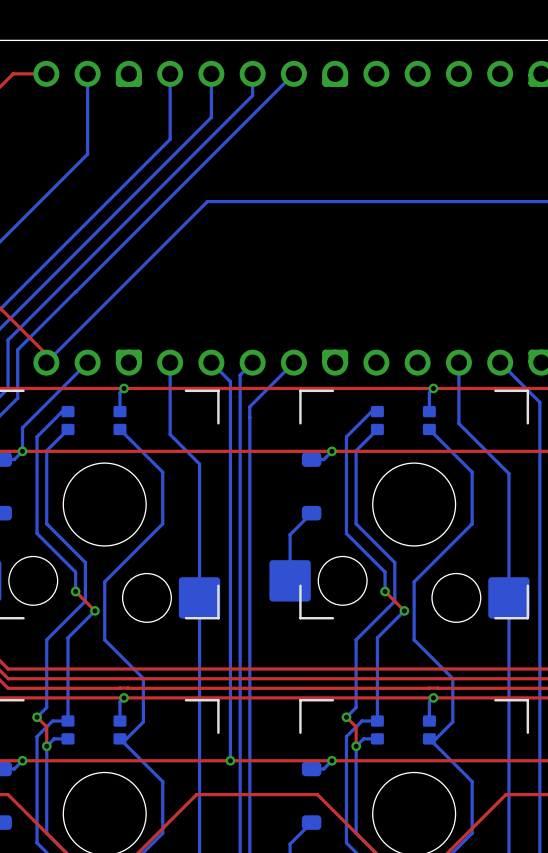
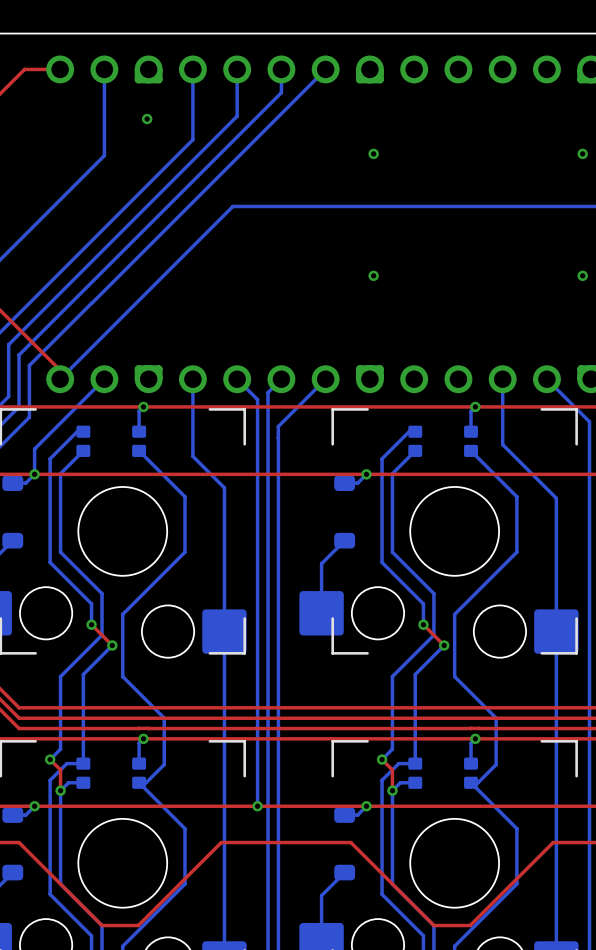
via: none -> (147, 119)
via: none -> (373, 153)
via: none -> (582, 153)
via: none -> (373, 275)
via: none -> (582, 275)

